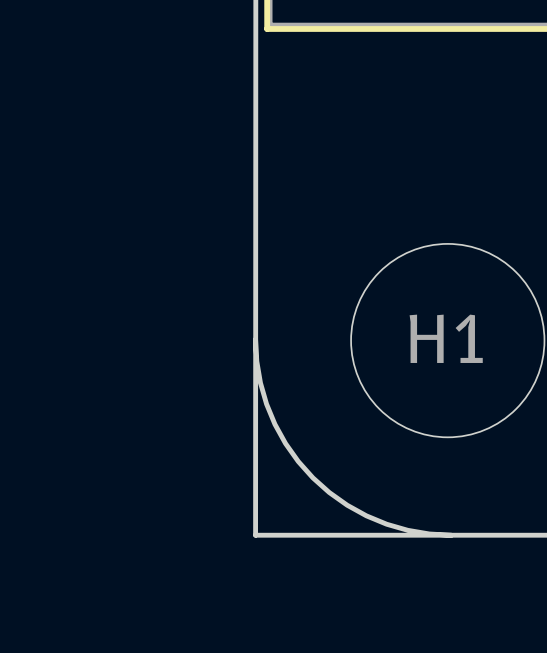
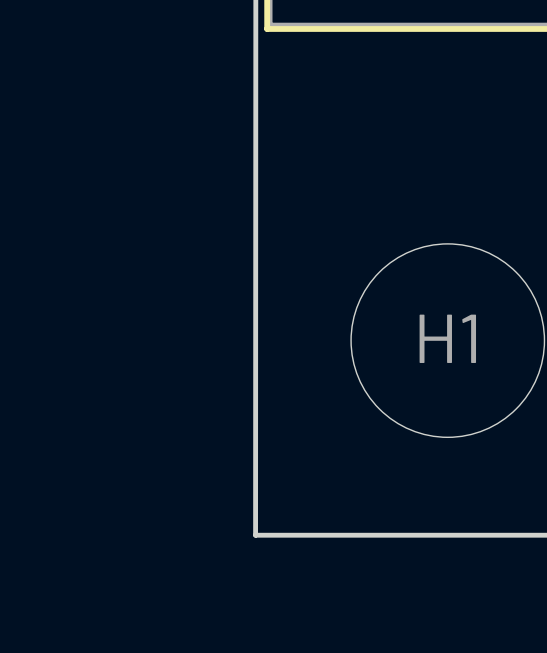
board edge: (255, 339) (260, 382) (274, 424) (285, 443) (312, 477) (347, 505) (386, 524) (407, 530) (451, 535) -> none

